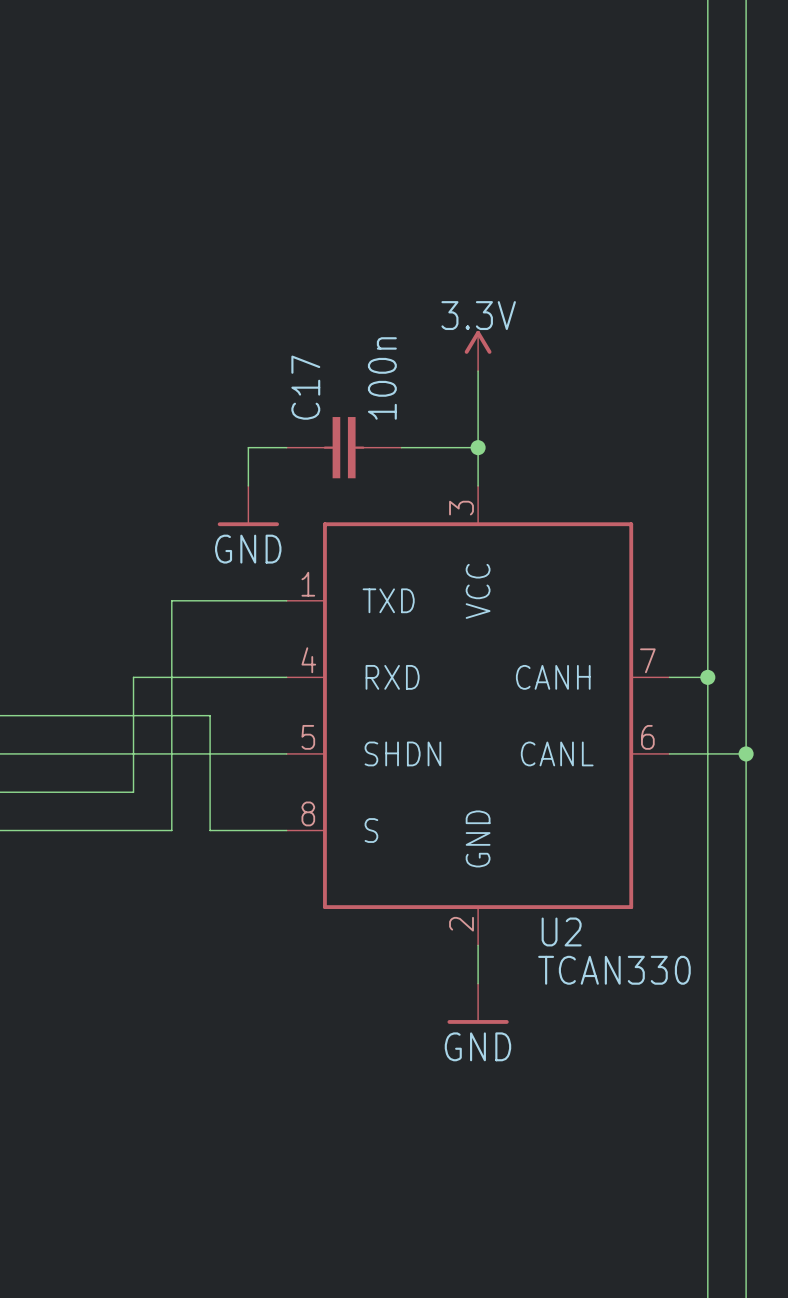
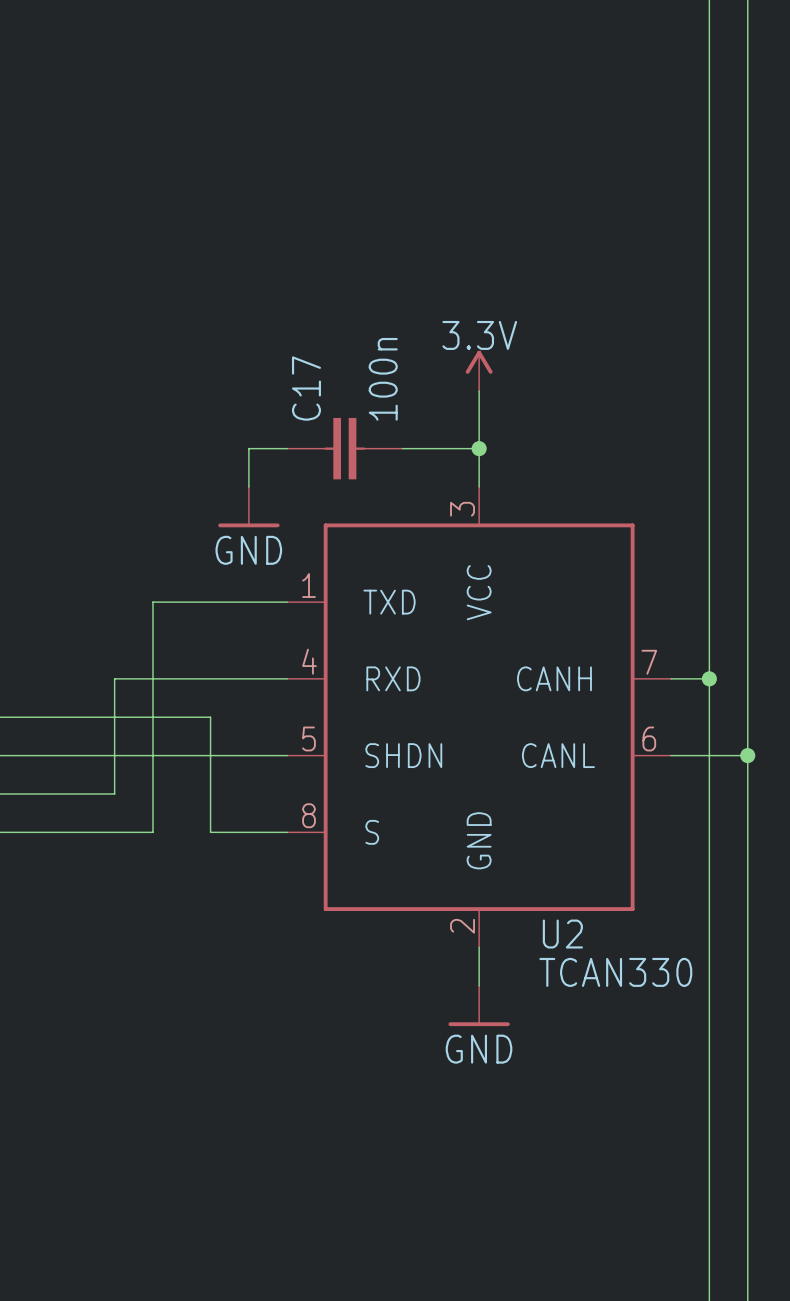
power symbol position: 3.3V (478, 350) -> 3.3V (479, 370)
wire: (171, 600) (171, 830) (152, 830) -> (172, 602) (152, 602) (152, 832)
wire: (133, 677) (133, 792) (114, 792) -> (133, 678) (114, 678) (114, 793)

